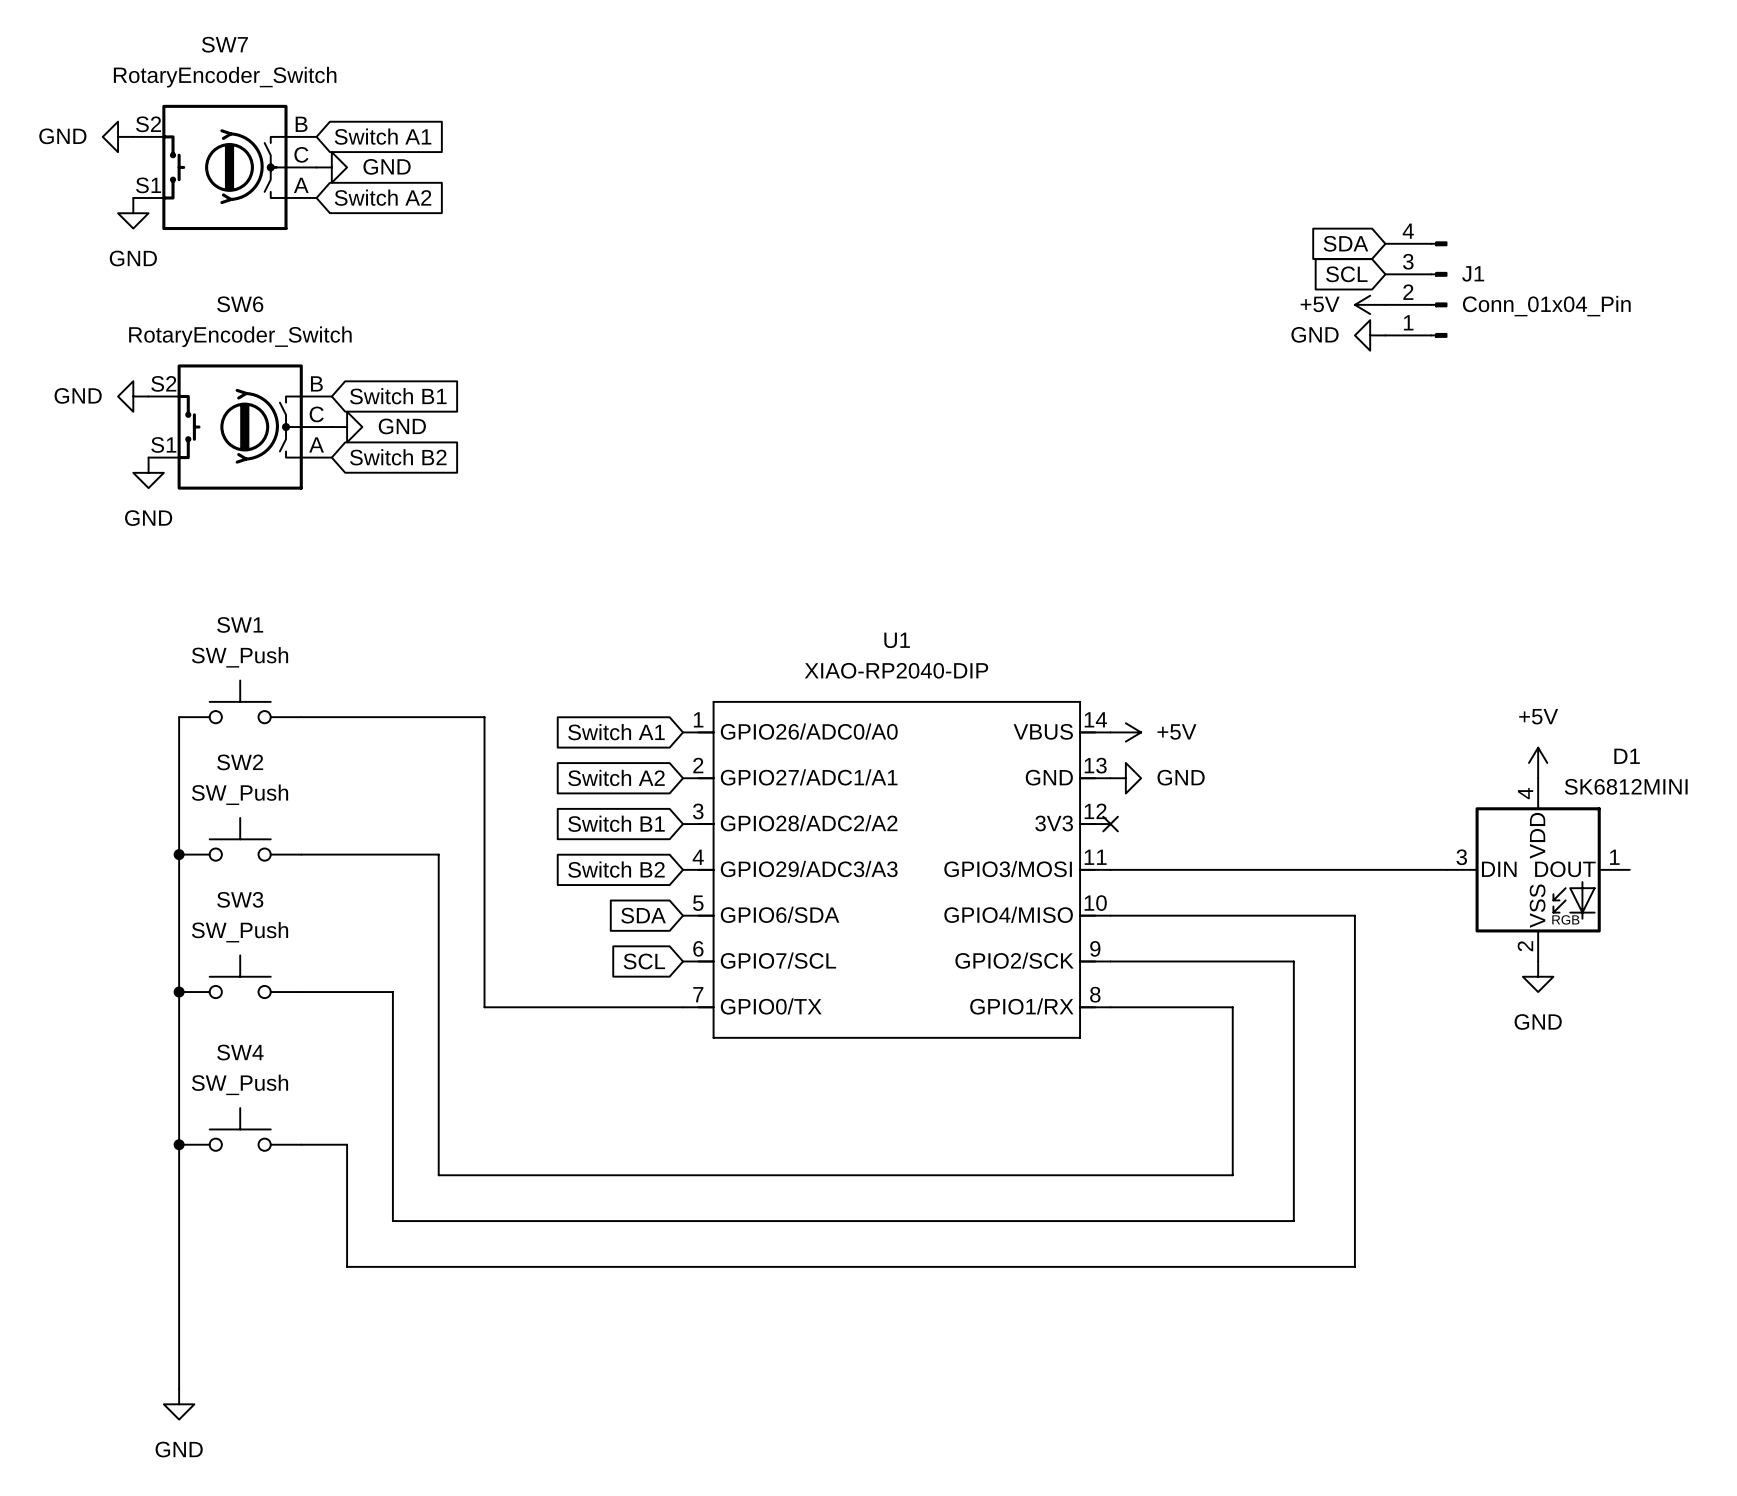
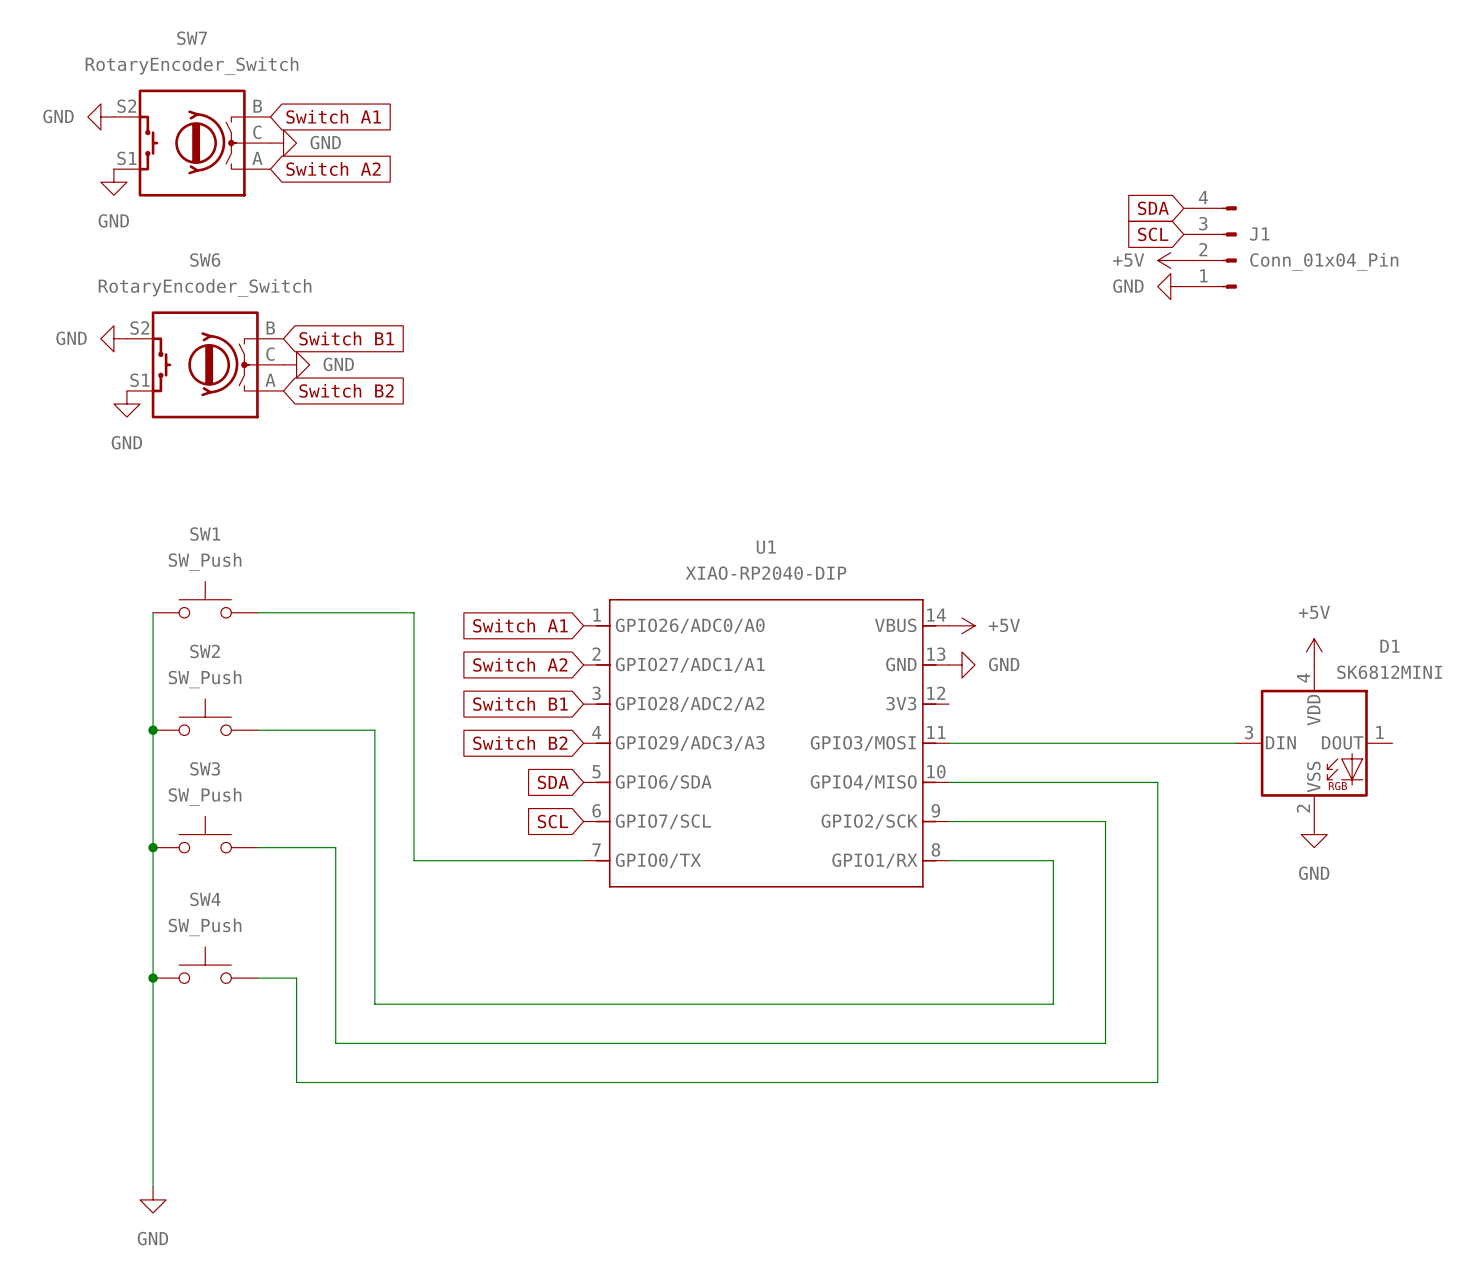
no-connect mark: (1110, 824) -> none

